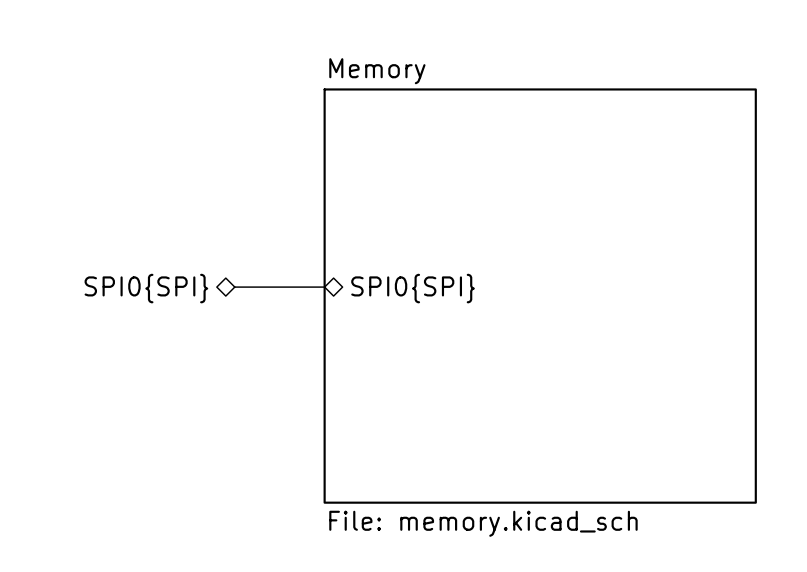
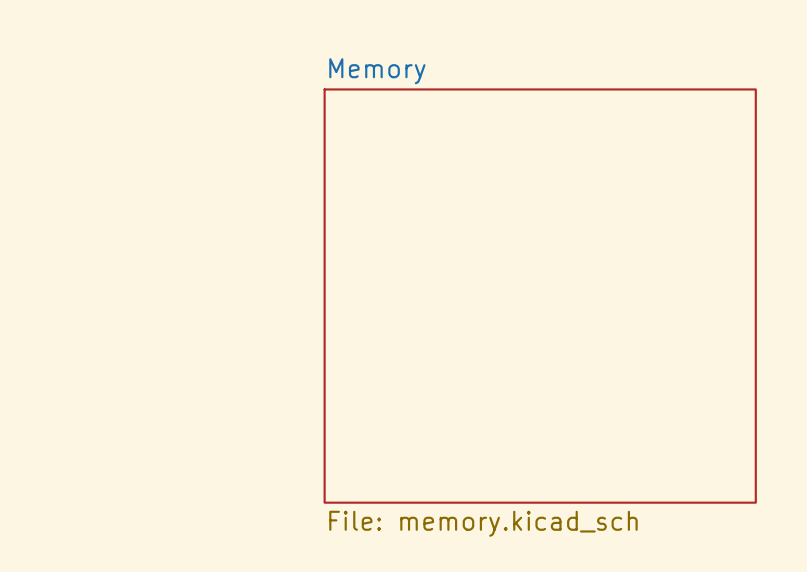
bus: (234, 287) (324, 287) -> none
hierarchical label: SPI0{SPI} (146, 288) -> none
sheet pin: SPI0{SPI} (413, 288) -> none

